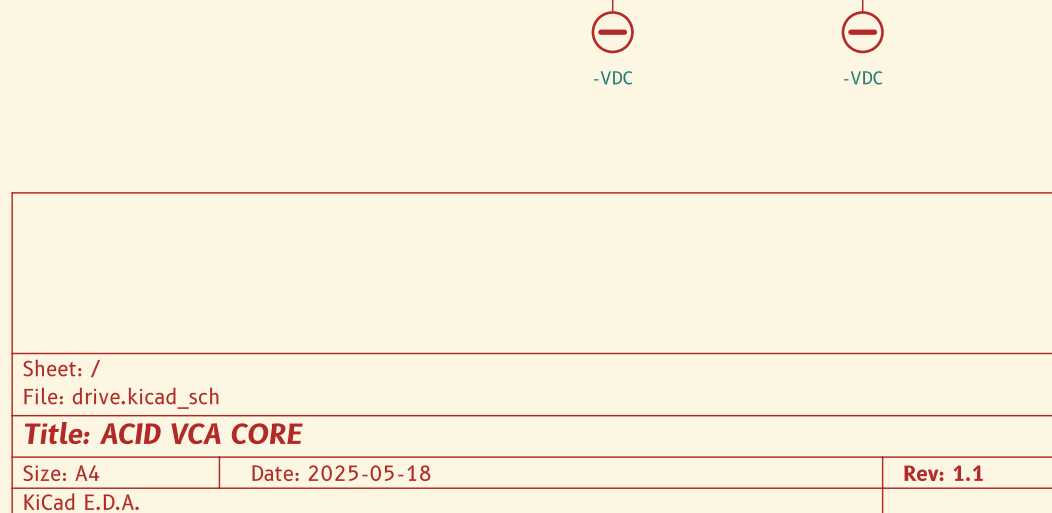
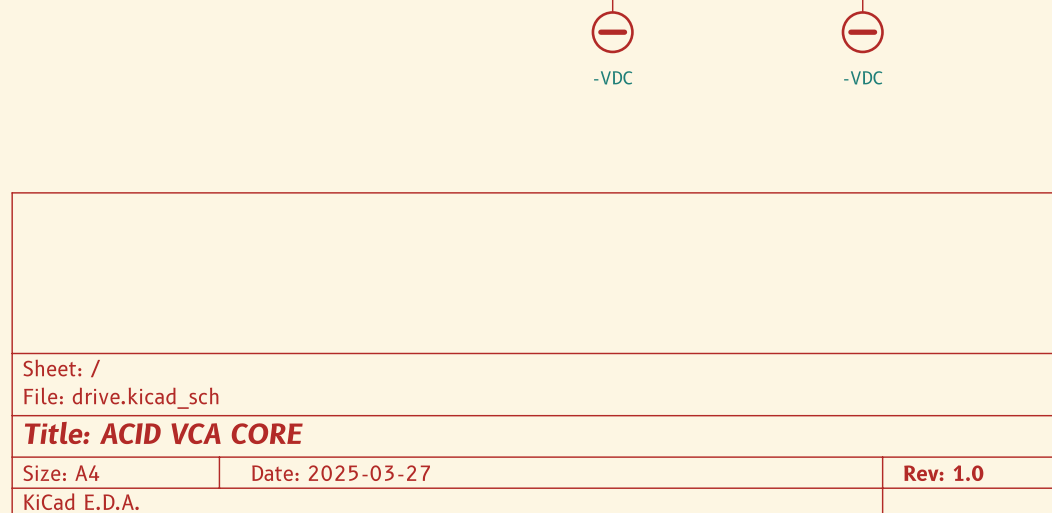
title block: Date: 2025-05-18 (341, 473) -> Date: 2025-03-27 (341, 473)
title block: Rev: 1.1 (943, 473) -> Rev: 1.0 (943, 473)

